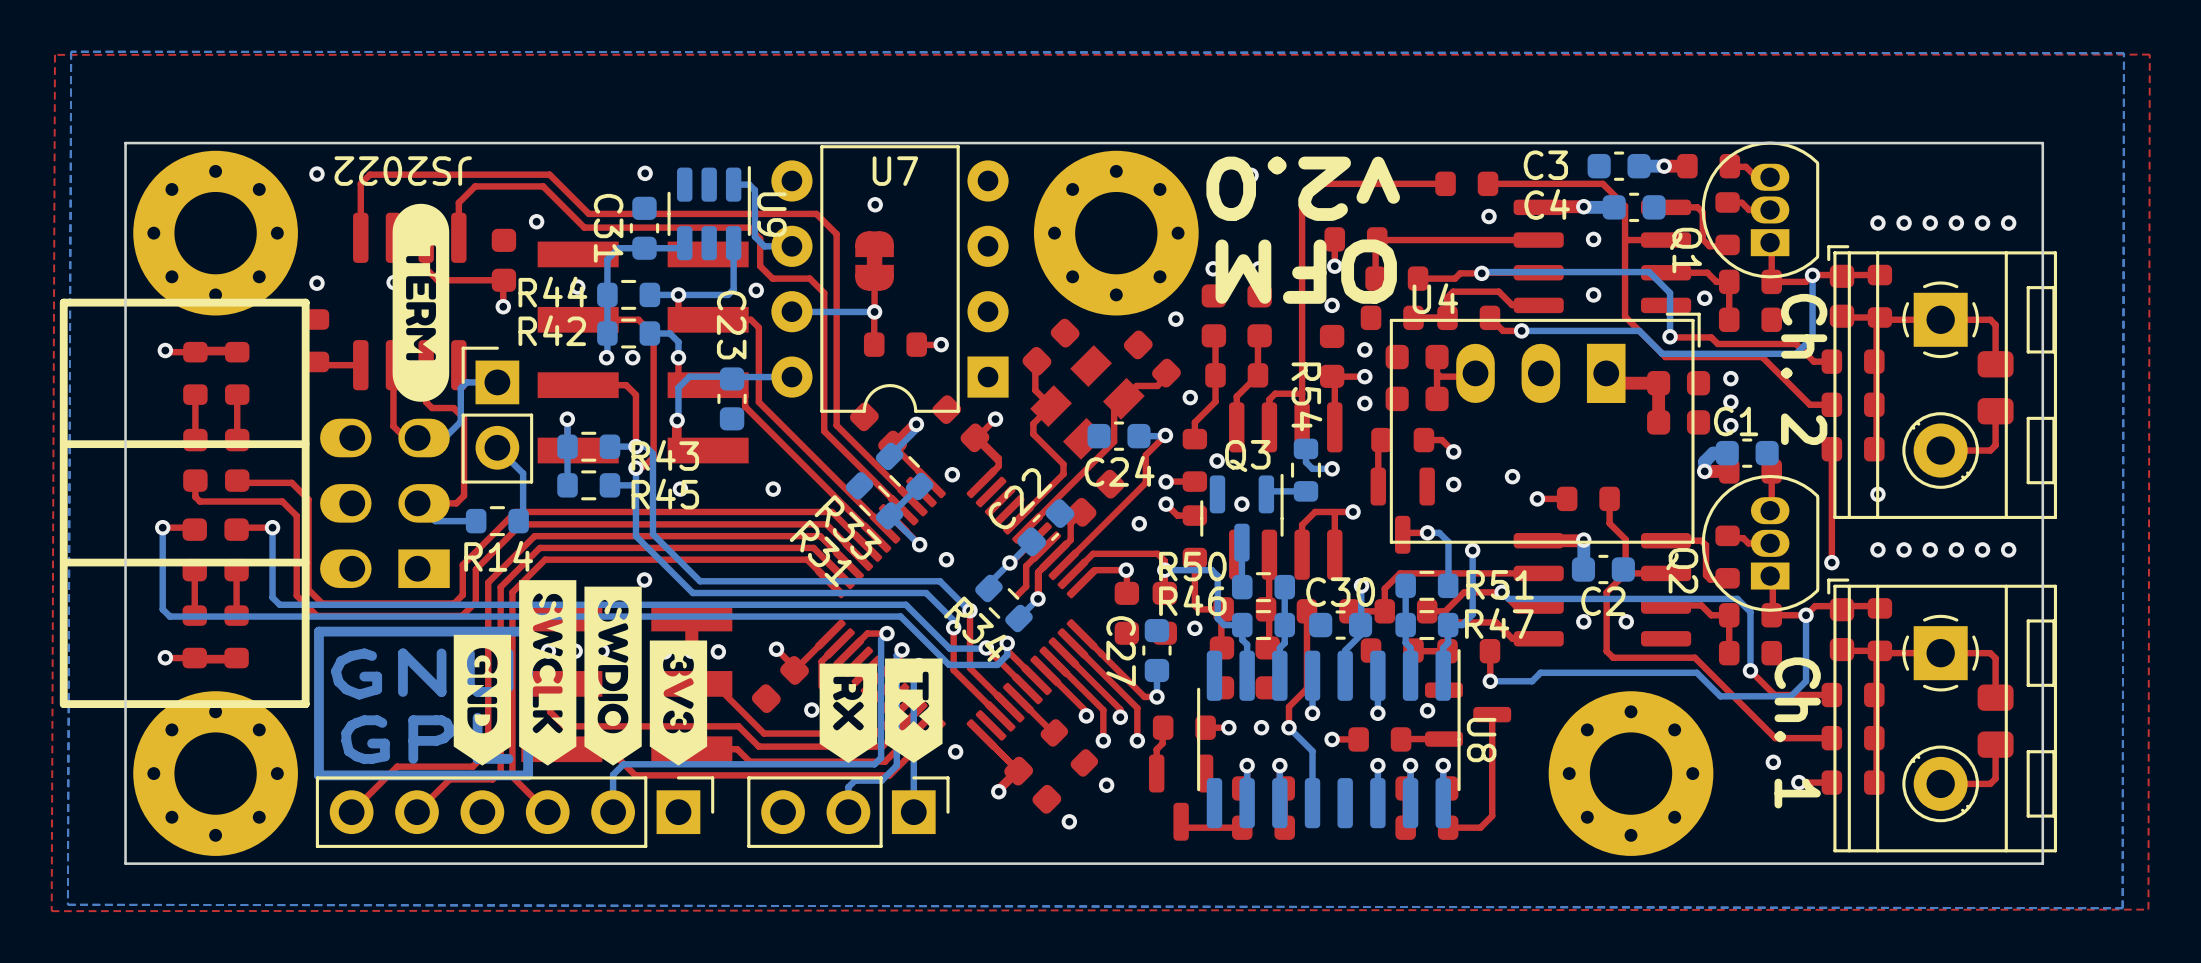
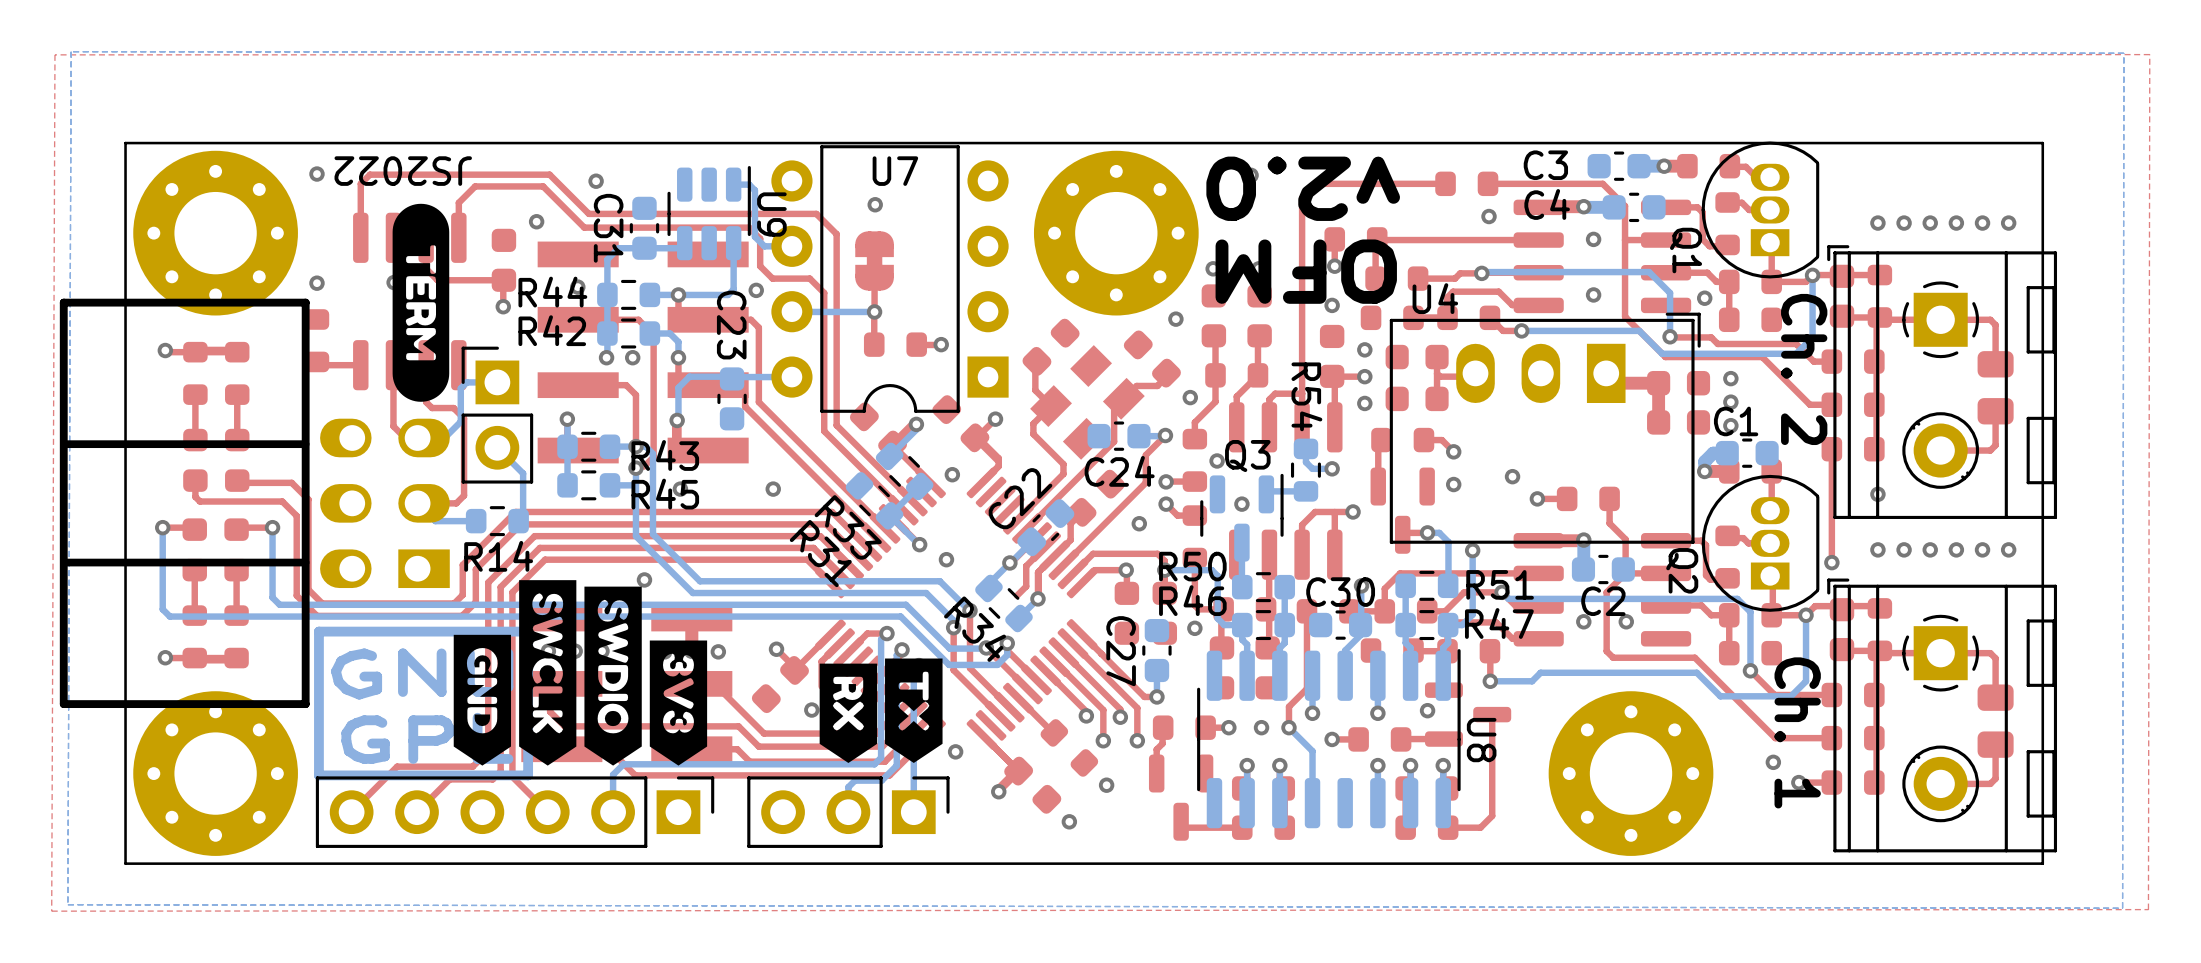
via position: (645, 173) -> (596, 181)

